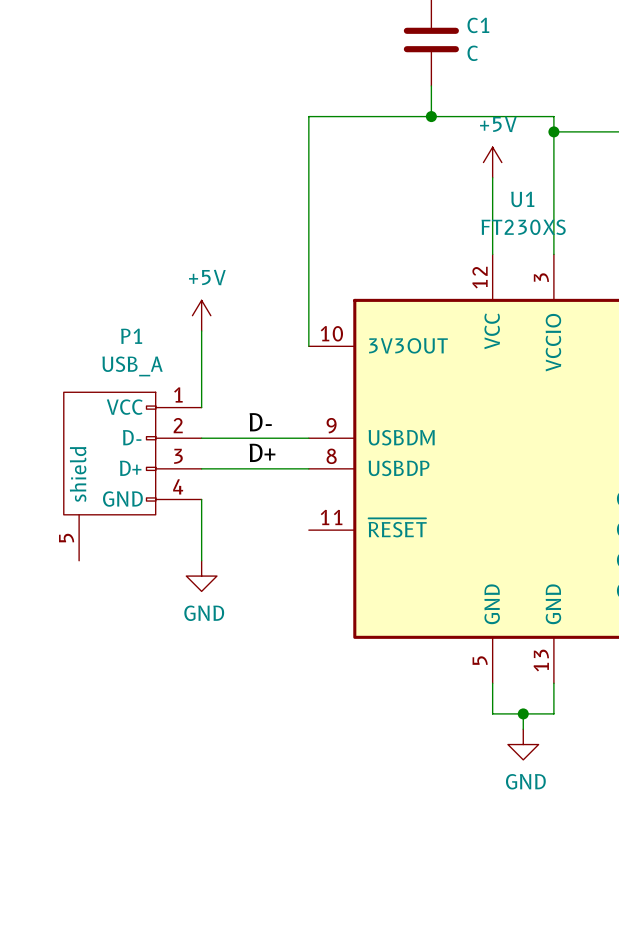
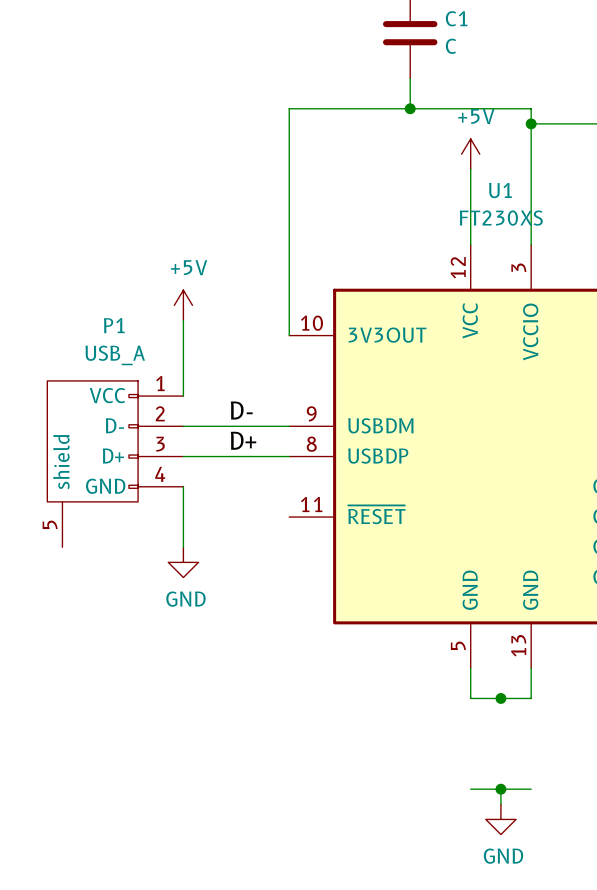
wire: (523, 713) (523, 729) -> (500, 789) (500, 804)
power symbol position: GND (523, 744) -> GND (500, 819)
wire: none -> (470, 789) (531, 789)
junction: none -> (500, 789)

